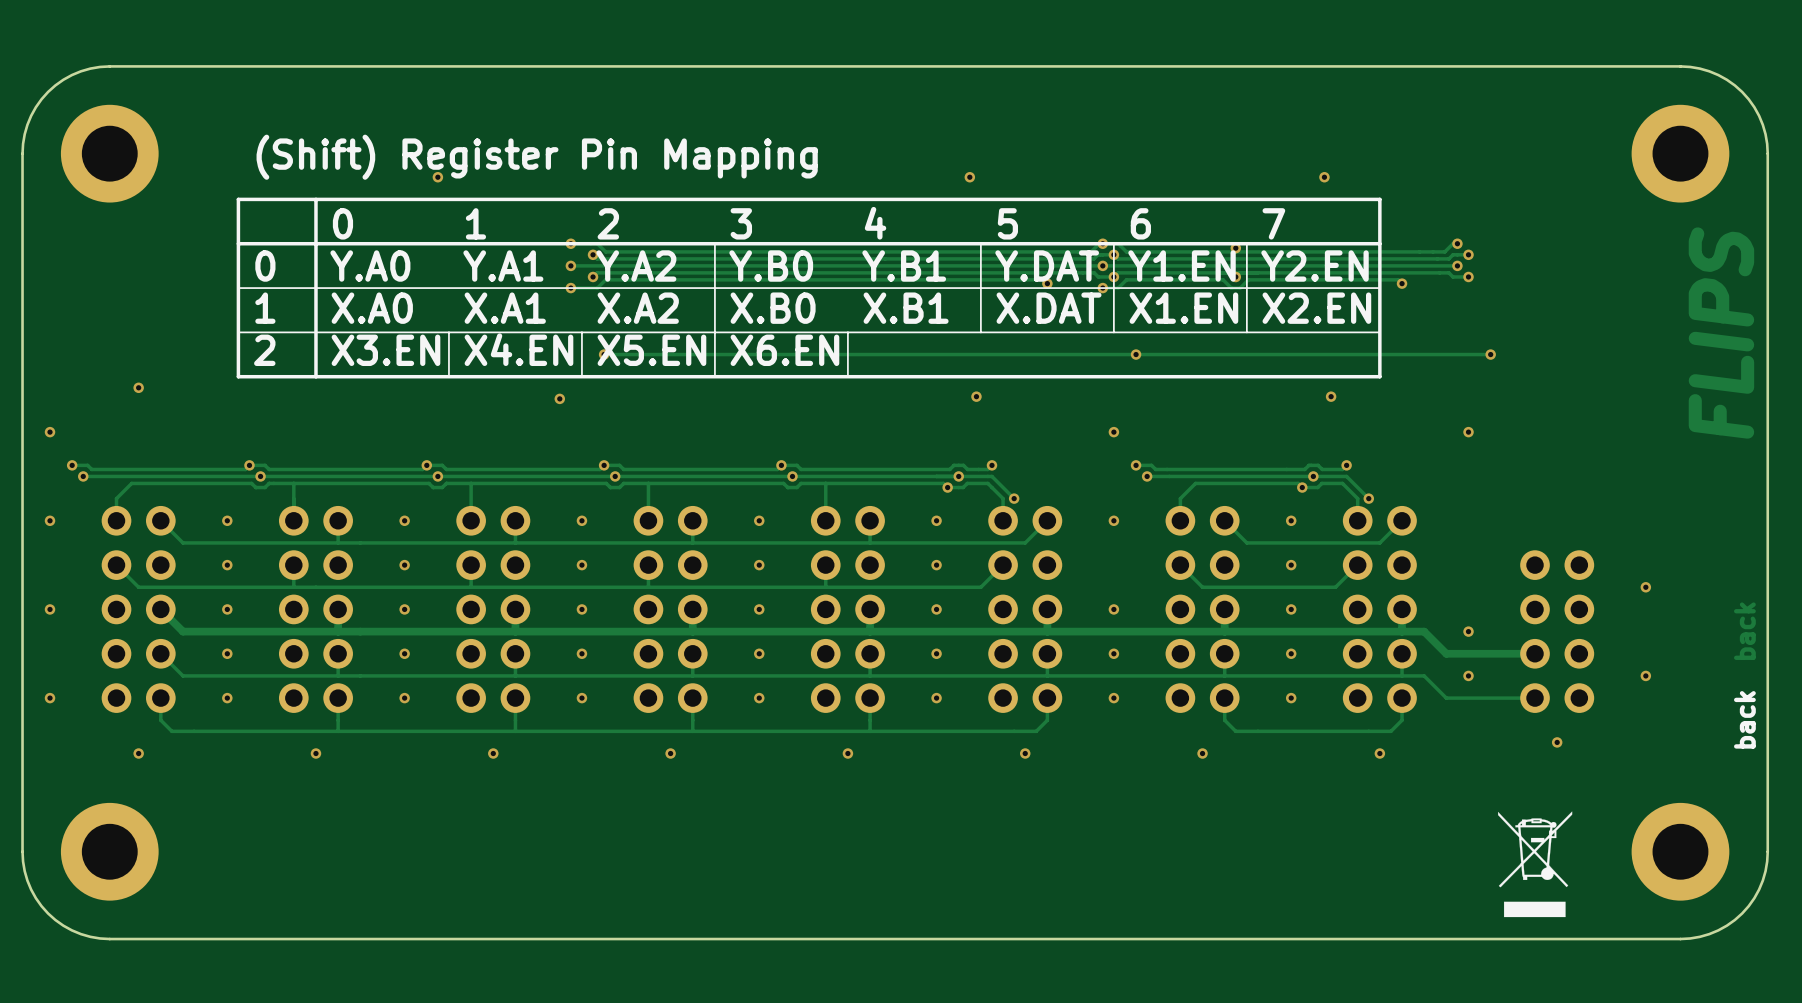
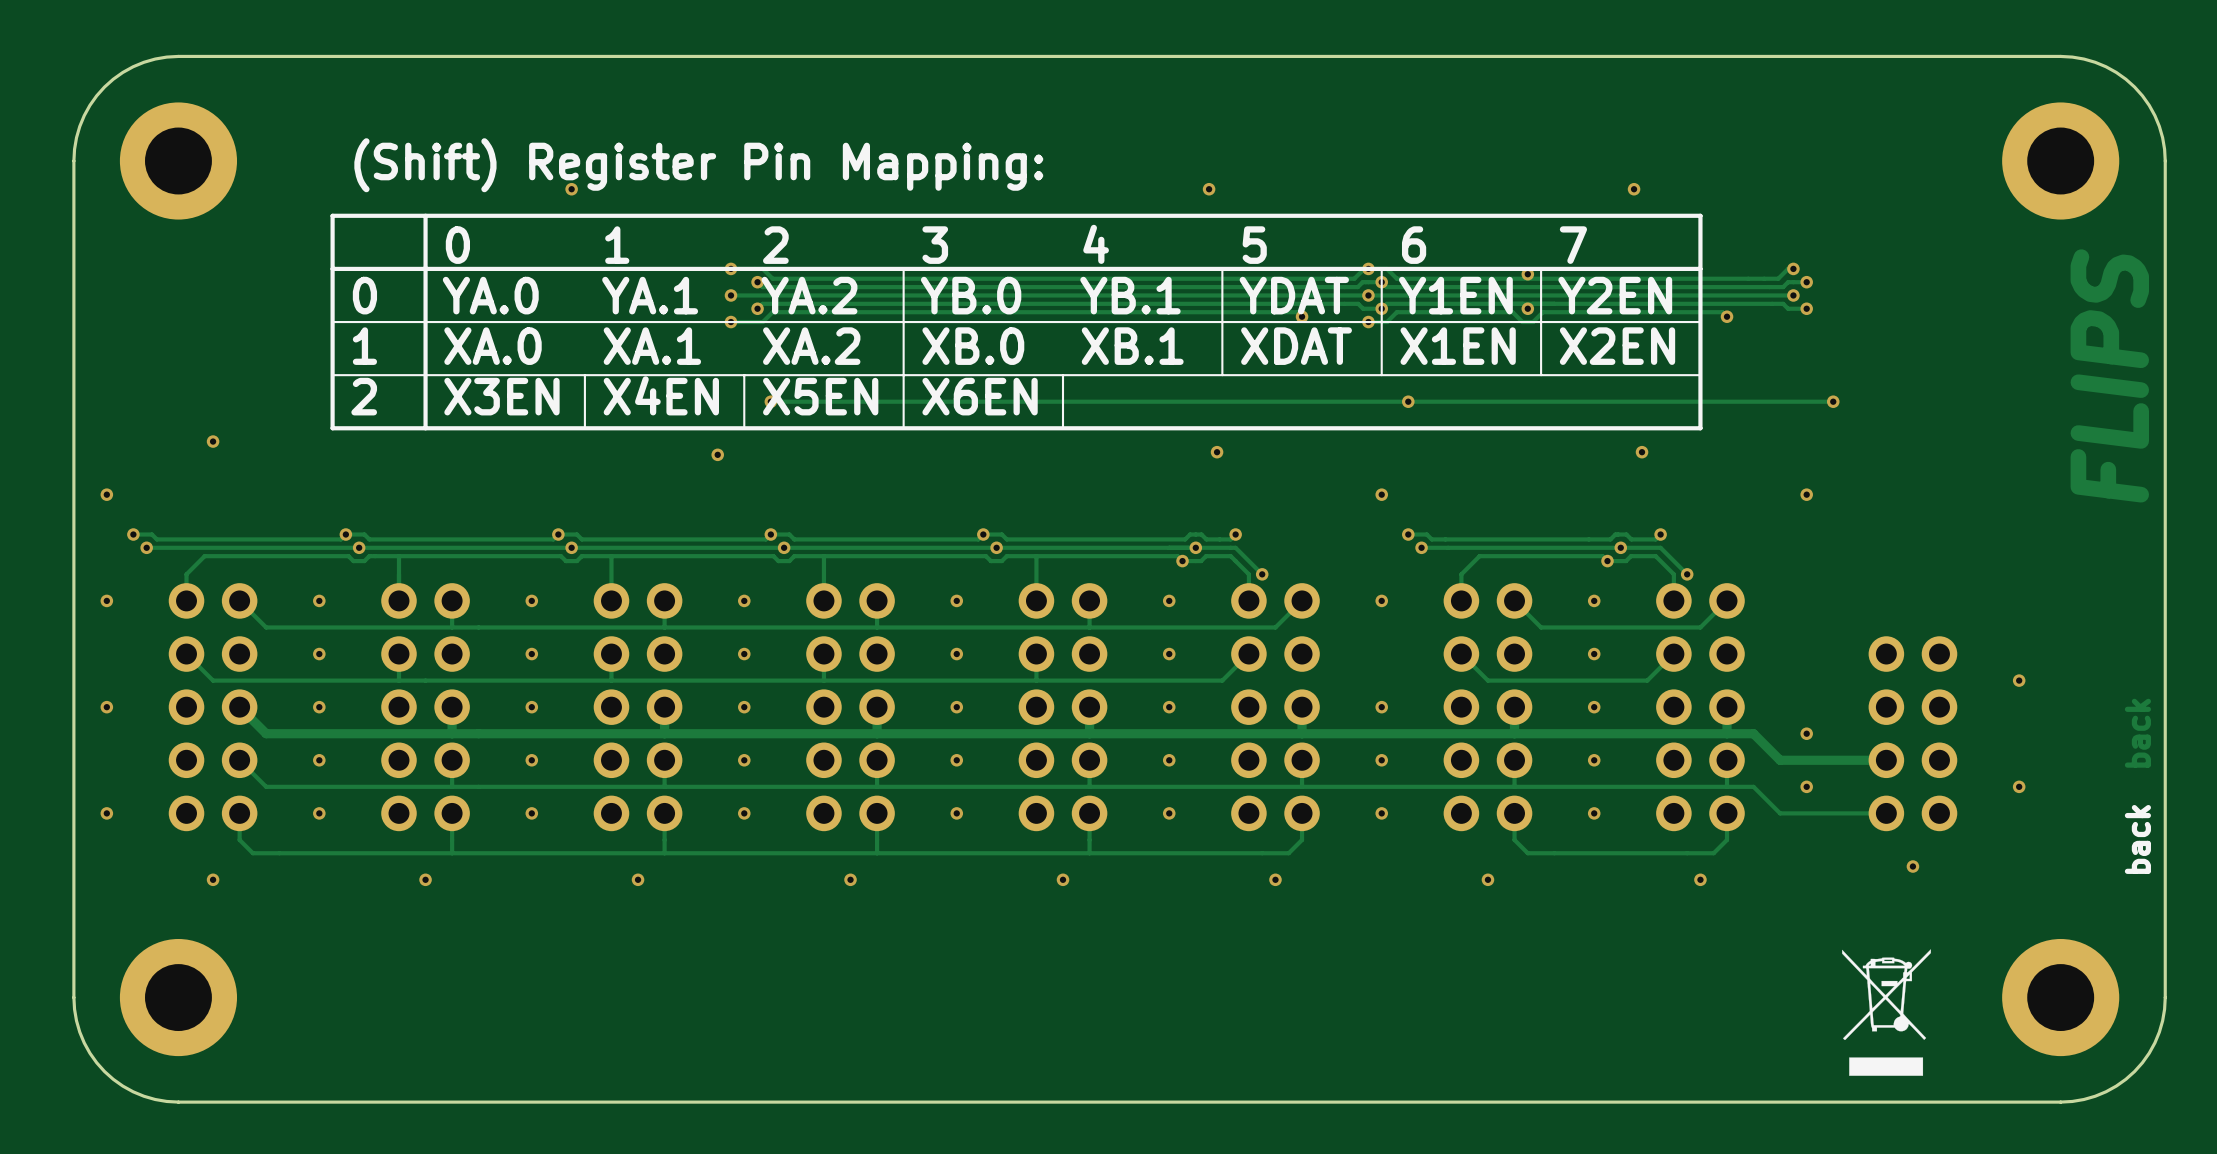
text: (Shift) Register Pin Mapping (537, 157) -> (Shift) Register Pin Mapping: (698, 165)
text: Y.A0 (370, 266) -> YA.0 (490, 295)
text: Y.A1 (503, 266) -> YA.1 (650, 295)
text: Y.A2 (636, 266) -> YA.2 (809, 295)
text: Y.B0 (771, 266) -> YB.0 (971, 295)
text: Y.B1 (904, 266) -> YB.1 (1130, 295)
text: Y.DAT (1047, 266) -> YDAT (1294, 295)
text: Y1.EN (1182, 266) -> Y1EN (1455, 295)
text: Y2.EN (1315, 266) -> Y2EN (1615, 295)
text: X.A0 (372, 308) -> XA.0 (493, 346)
text: X.A1 (505, 308) -> XA.1 (652, 346)
text: X.A2 (638, 308) -> XA.2 (811, 346)
text: X.B0 (773, 308) -> XB.0 (973, 346)
text: X.B1 (906, 308) -> XB.1 (1132, 346)
text: X.DAT (1049, 308) -> XDAT (1296, 346)
text: X1.EN (1183, 308) -> X1EN (1458, 346)
text: X2.EN (1316, 308) -> X2EN (1617, 346)
text: X4.EN (518, 349) -> X4EN (661, 395)
text: X3.EN (385, 350) -> X3EN (501, 396)
text: X5.EN (651, 350) -> X5EN (820, 396)
text: X6.EN (784, 350) -> X6EN (980, 396)

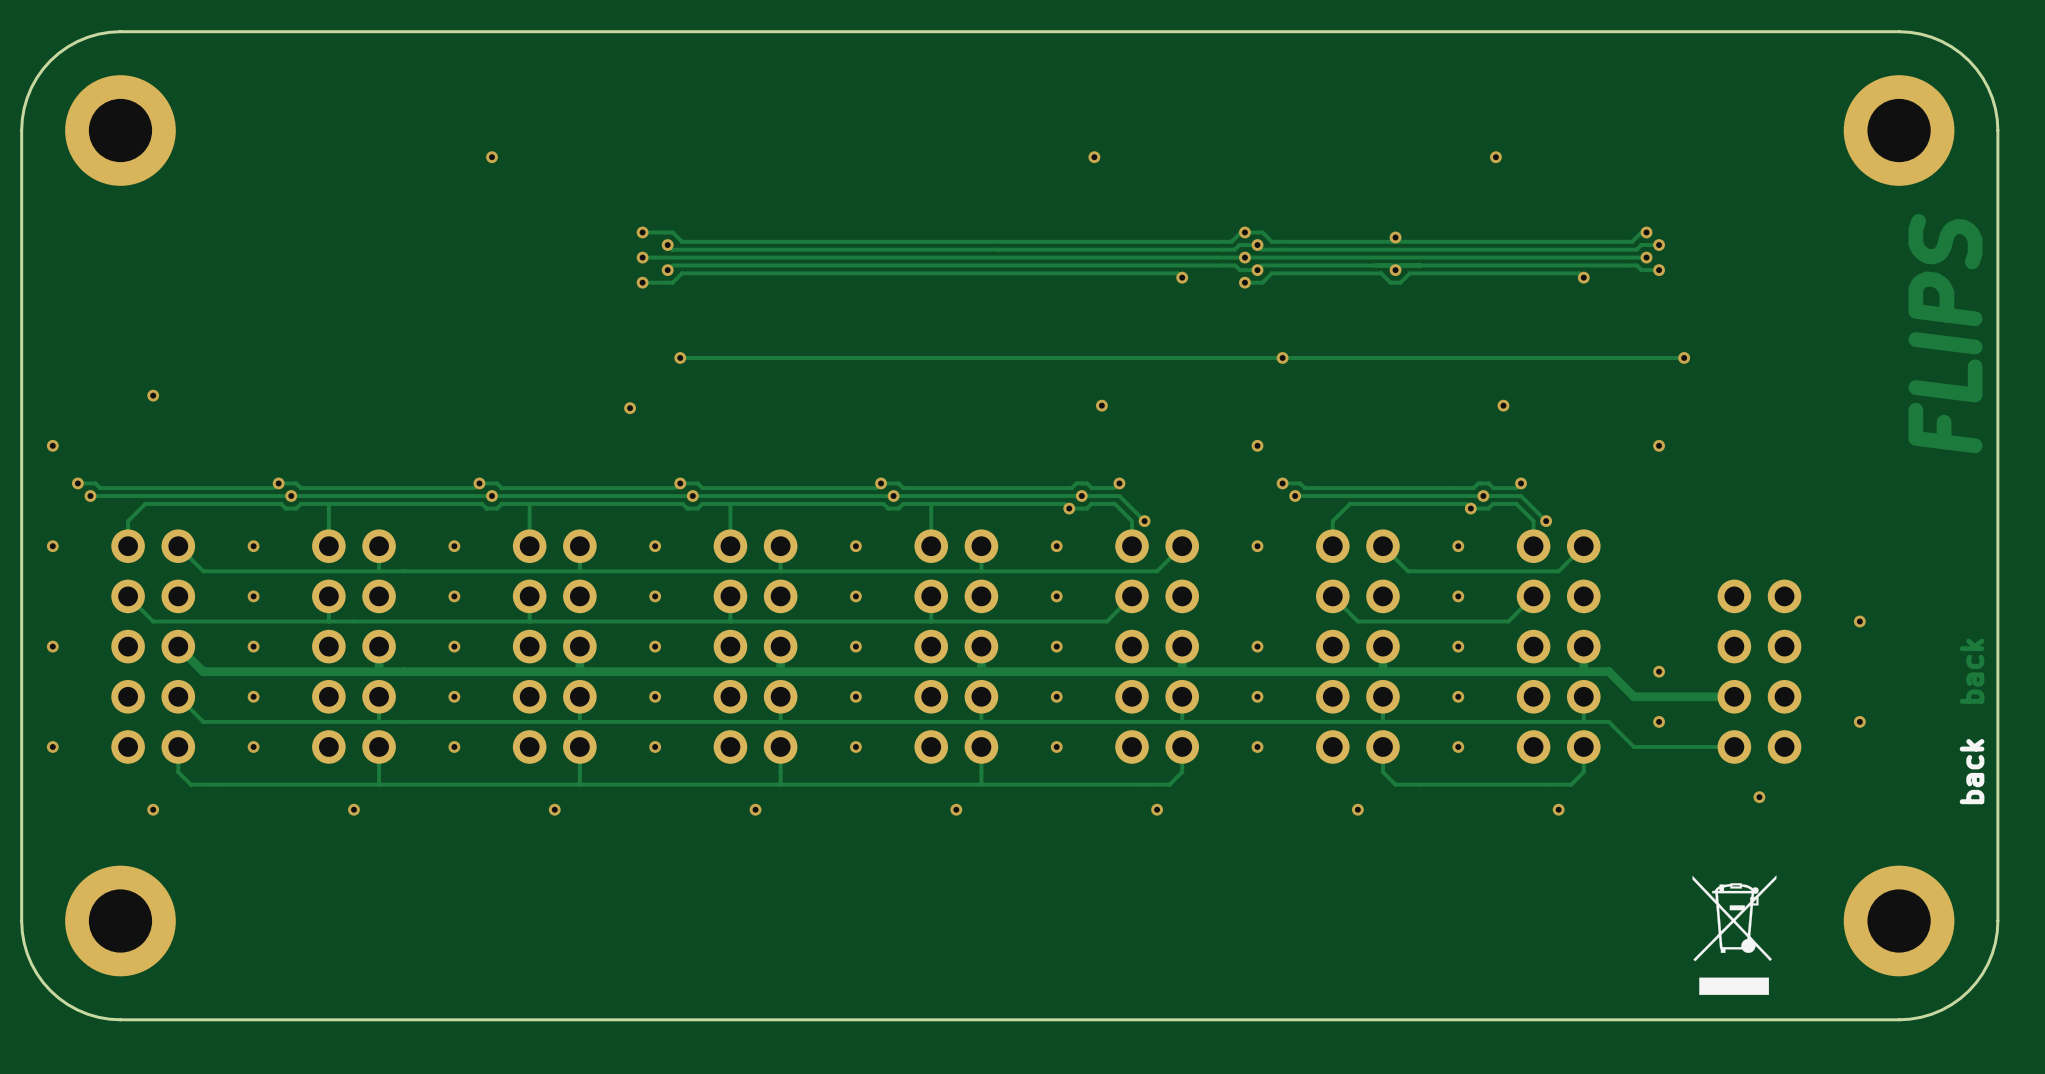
text: (Shift) Register Pin Mapping: (698, 165) -> none
line: (425, 215) (425, 428) -> none
line: (1700, 215) (332, 215) (332, 428) (1700, 428) (1700, 215) -> none
text: 4 (1096, 244) -> none
text: 0 (457, 245) -> none
text: 1 (617, 245) -> none
text: 2 (775, 245) -> none
text: 3 (935, 245) -> none
text: 5 (1254, 245) -> none
text: 6 (1414, 245) -> none
text: 7 (1573, 245) -> none
line: (903, 268) (903, 428) -> none
line: (1222, 268) (1222, 375) -> none
line: (1381, 268) (1381, 375) -> none
line: (1541, 268) (1541, 375) -> none
line: (1700, 268) (332, 268) -> none
text: 0 (364, 295) -> none
text: YA.0 (490, 295) -> none
text: YA.1 (650, 295) -> none
text: YA.2 (809, 295) -> none
text: YB.0 (971, 295) -> none
text: YB.1 (1130, 295) -> none
text: YDAT (1294, 295) -> none
text: Y1EN (1455, 295) -> none
text: Y2EN (1615, 295) -> none
line: (1700, 322) (332, 322) (332, 375) (1700, 375) -> none
text: 1 (364, 346) -> none
text: XA.0 (493, 346) -> none
text: XA.1 (652, 346) -> none
text: XA.2 (811, 346) -> none
text: XB.0 (973, 346) -> none
text: XB.1 (1132, 346) -> none
text: XDAT (1296, 346) -> none
text: X1EN (1458, 346) -> none
text: X2EN (1617, 346) -> none
line: (584, 375) (584, 428) -> none
line: (744, 375) (744, 428) -> none
line: (1063, 375) (1063, 428) -> none
text: X4EN (661, 395) -> none
text: 2 (364, 396) -> none
text: X3EN (501, 396) -> none
text: X5EN (820, 396) -> none
text: X6EN (980, 396) -> none

